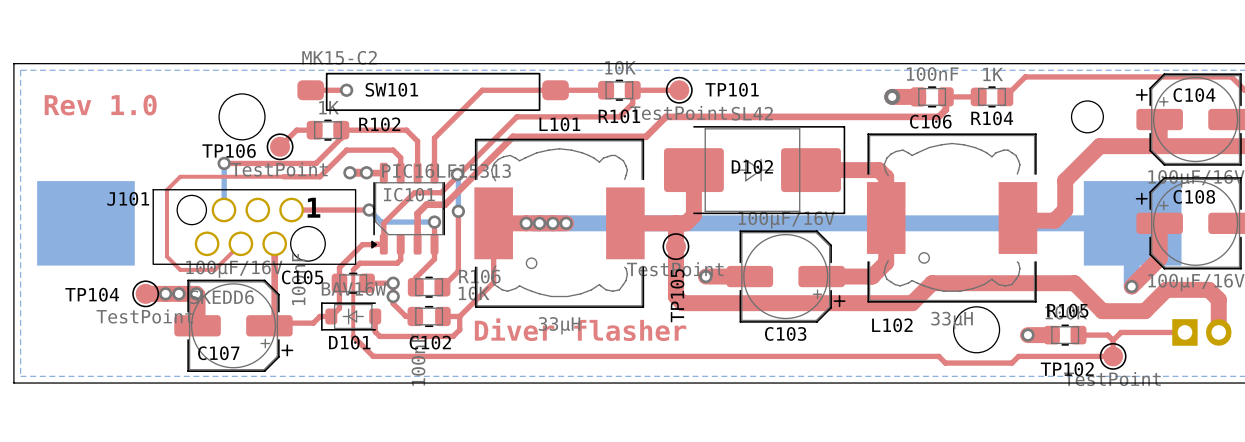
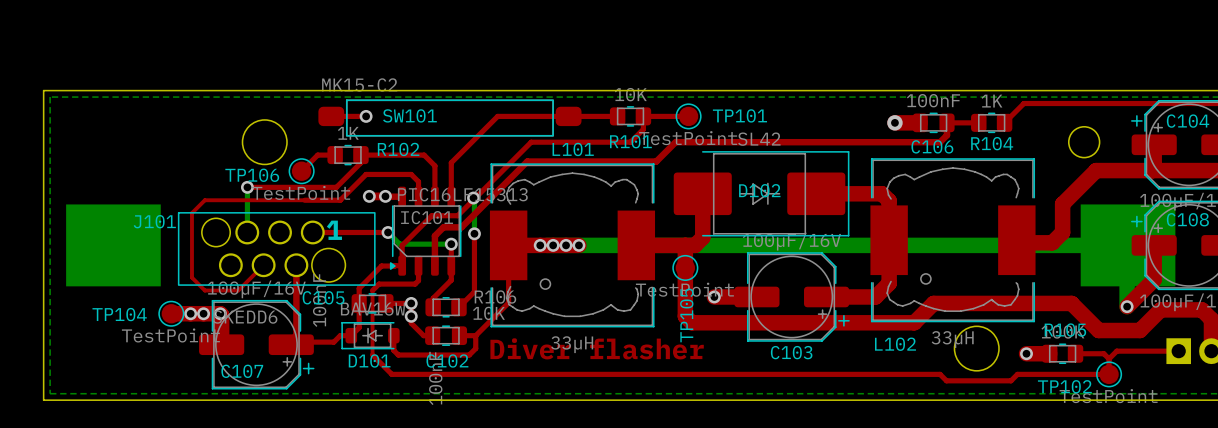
text: Rev 1.0 (100, 105) -> none

